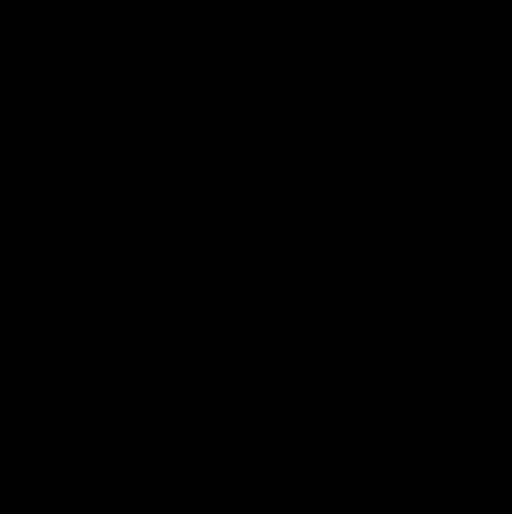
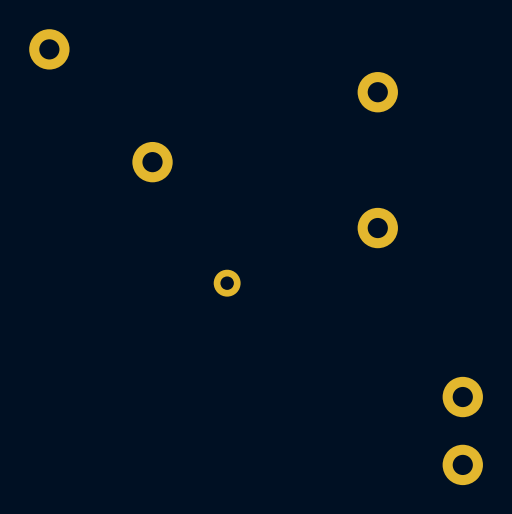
part: none -> (49, 49)
part: none -> (377, 92)
part: none -> (152, 162)
part: none -> (377, 228)
part: none -> (227, 283)
part: none -> (462, 397)
part: none -> (462, 464)

